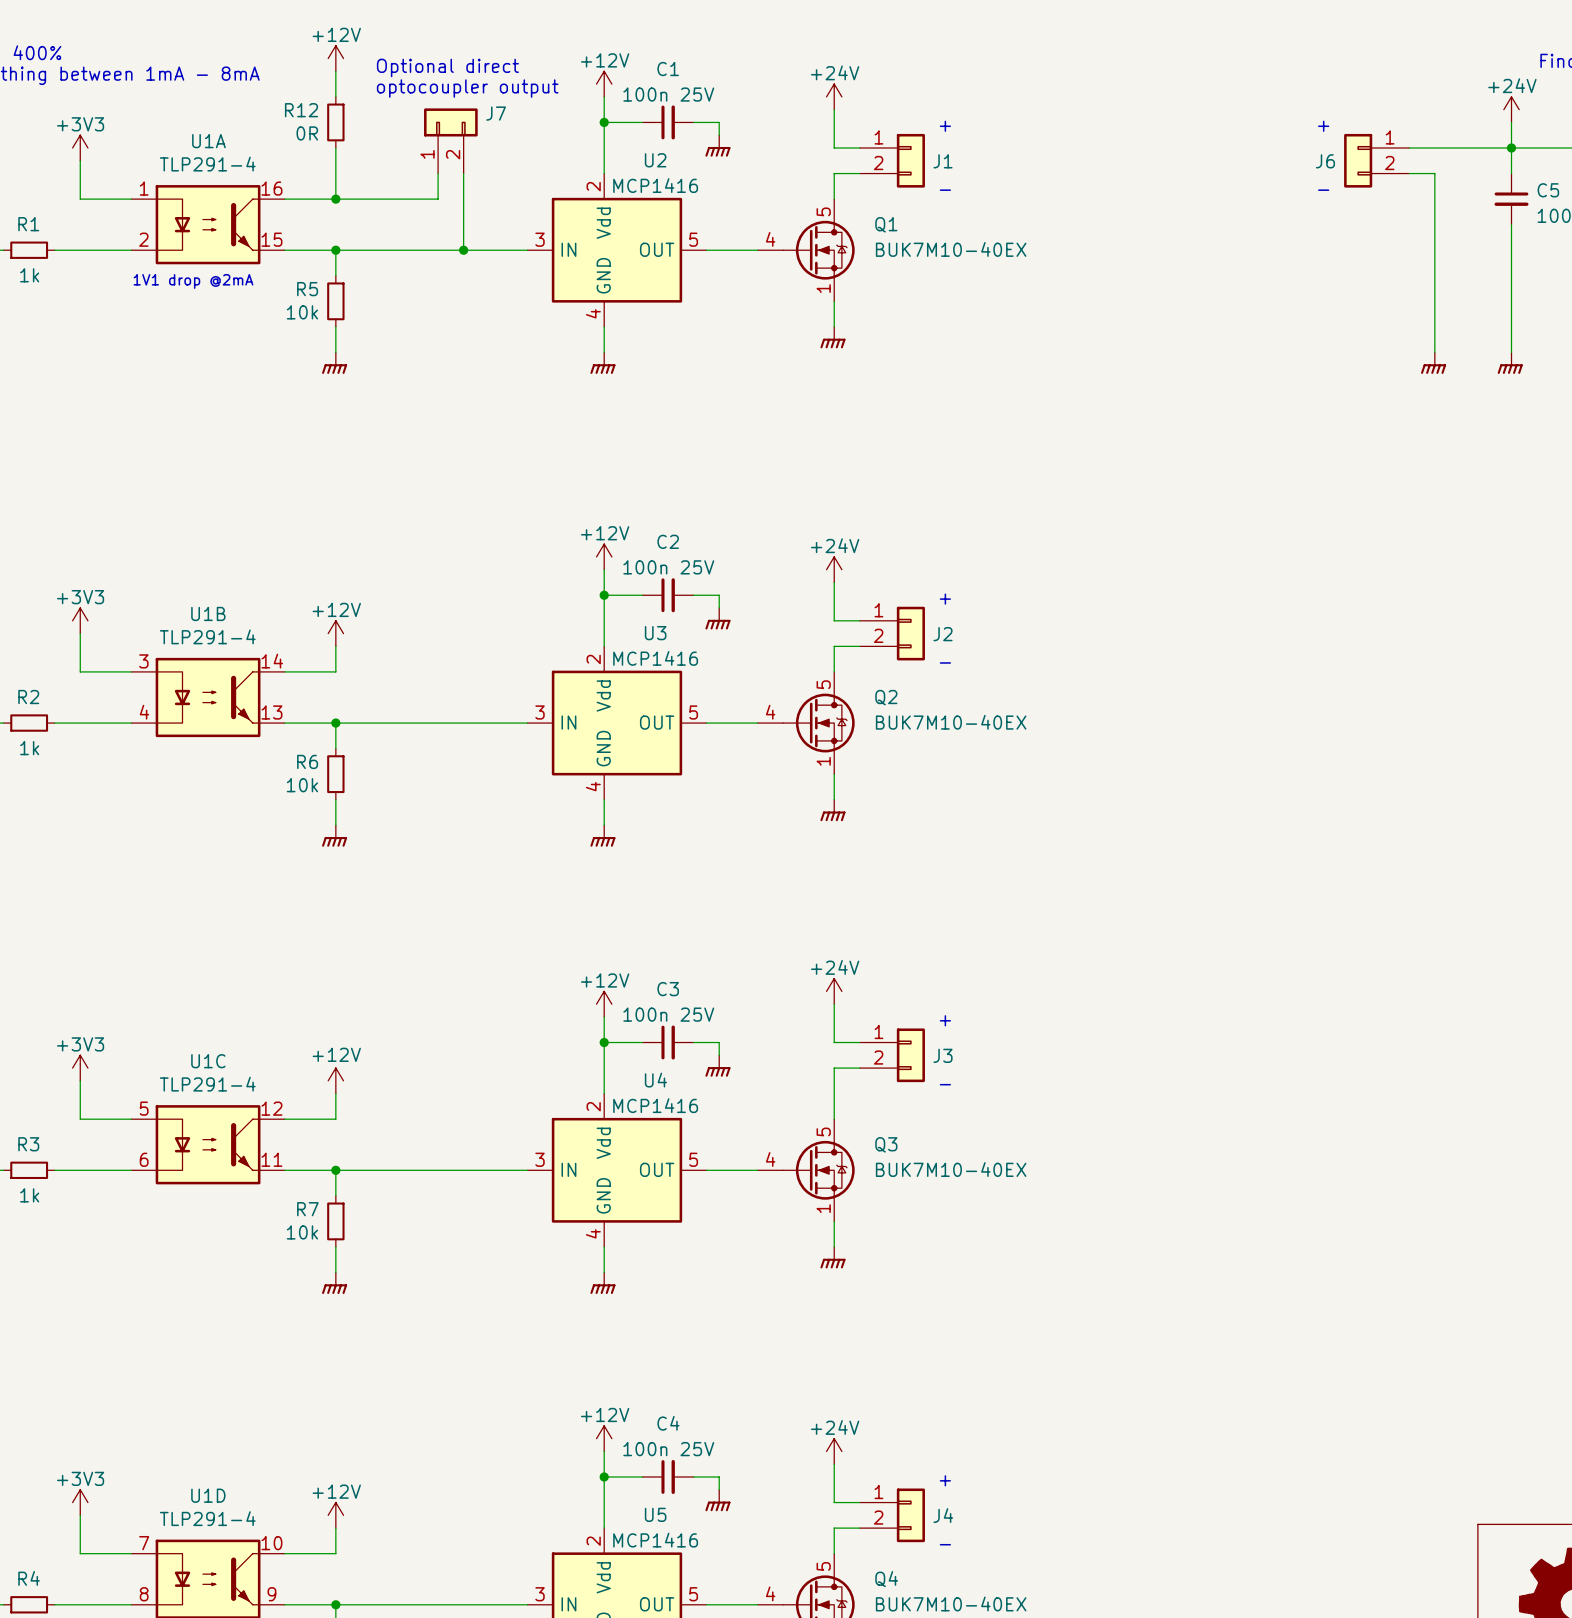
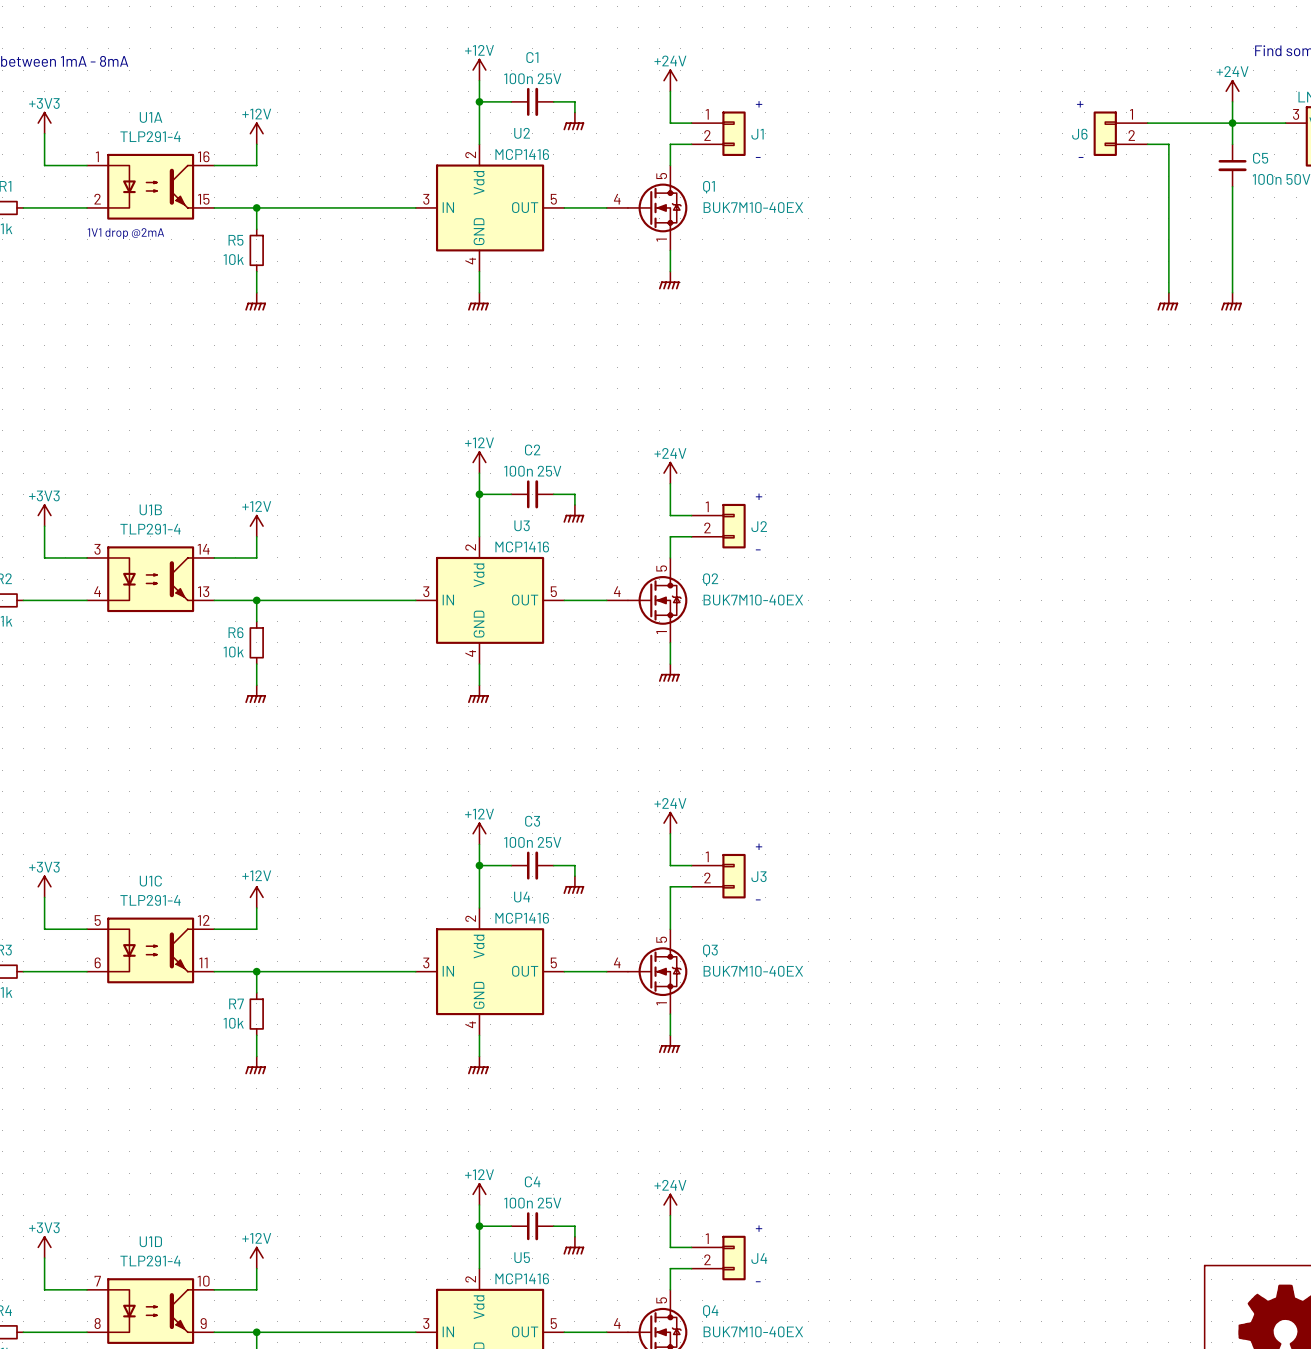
power symbol position: +12V (335, 58) -> +12V (256, 133)
text: Optional direct (447, 67) -> none
wire: (335, 71) (335, 96) -> none
text: optocoupler output (467, 88) -> none
R12: 0R (335, 122) -> none
J7: (450, 140) -> none
wire: (438, 173) (438, 199) (335, 199) -> none
wire: (463, 173) (463, 250) -> none
junction: (335, 199) -> none
junction: (463, 250) -> none

